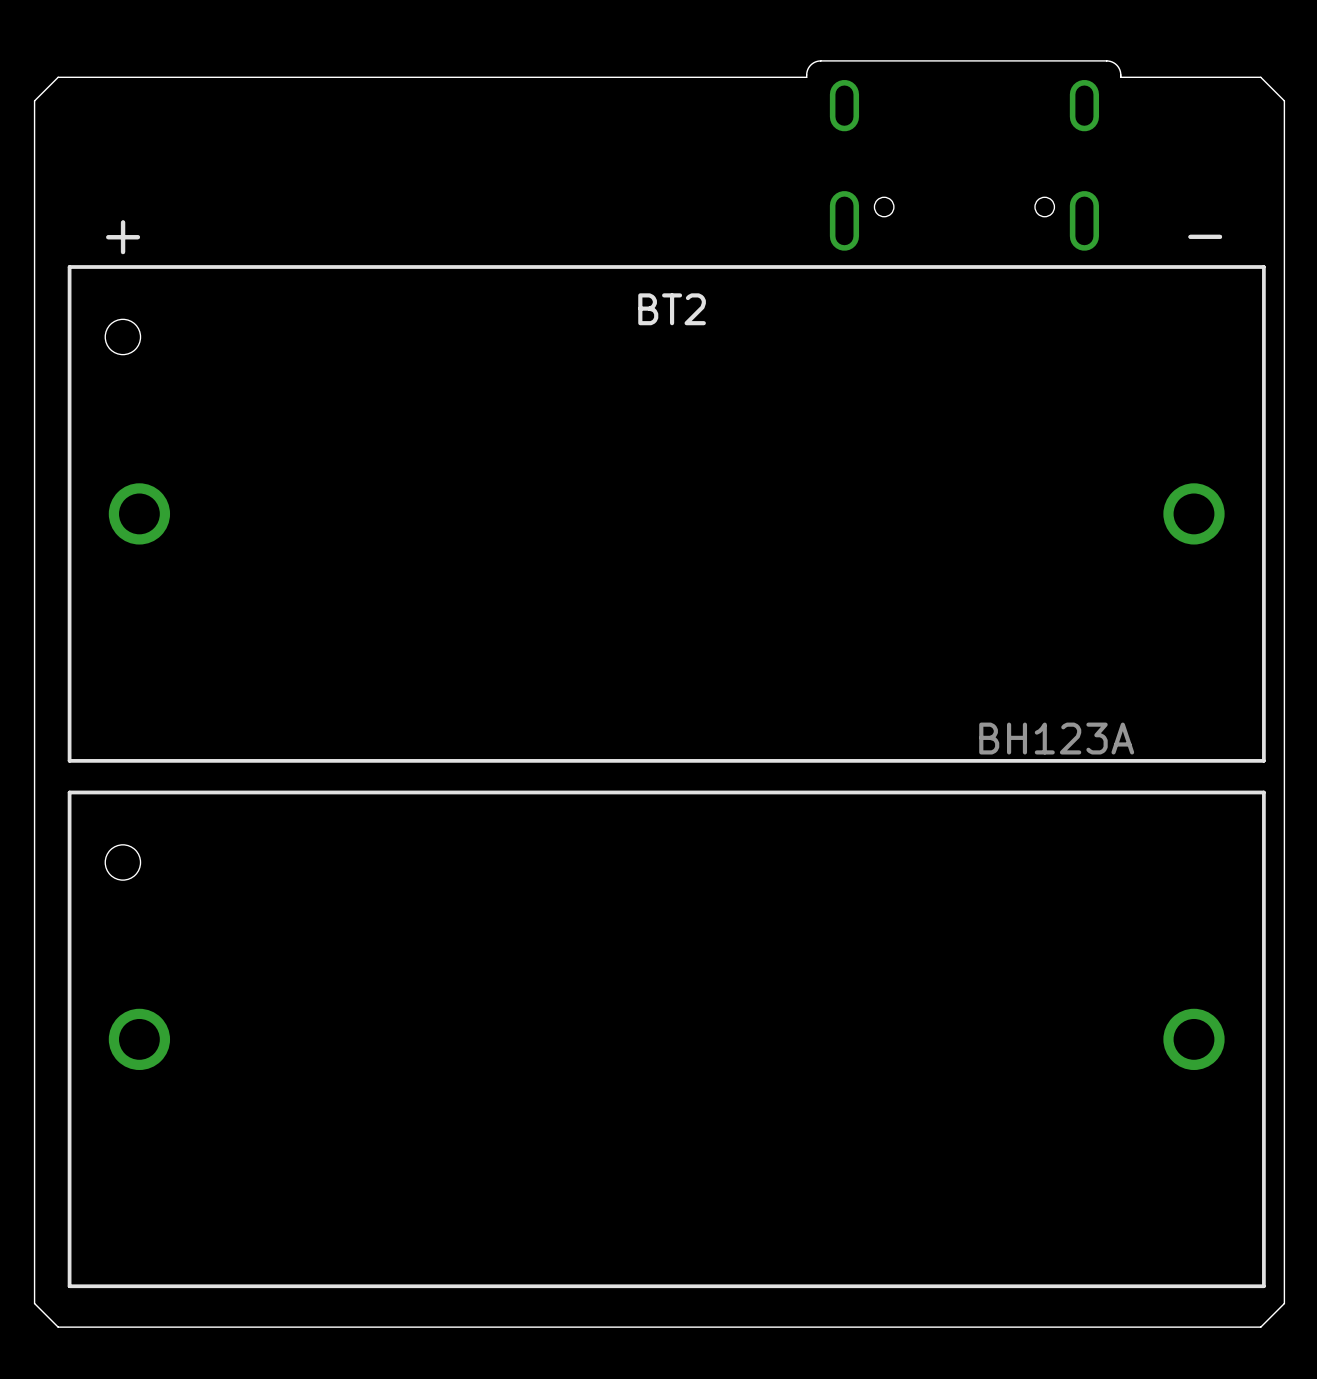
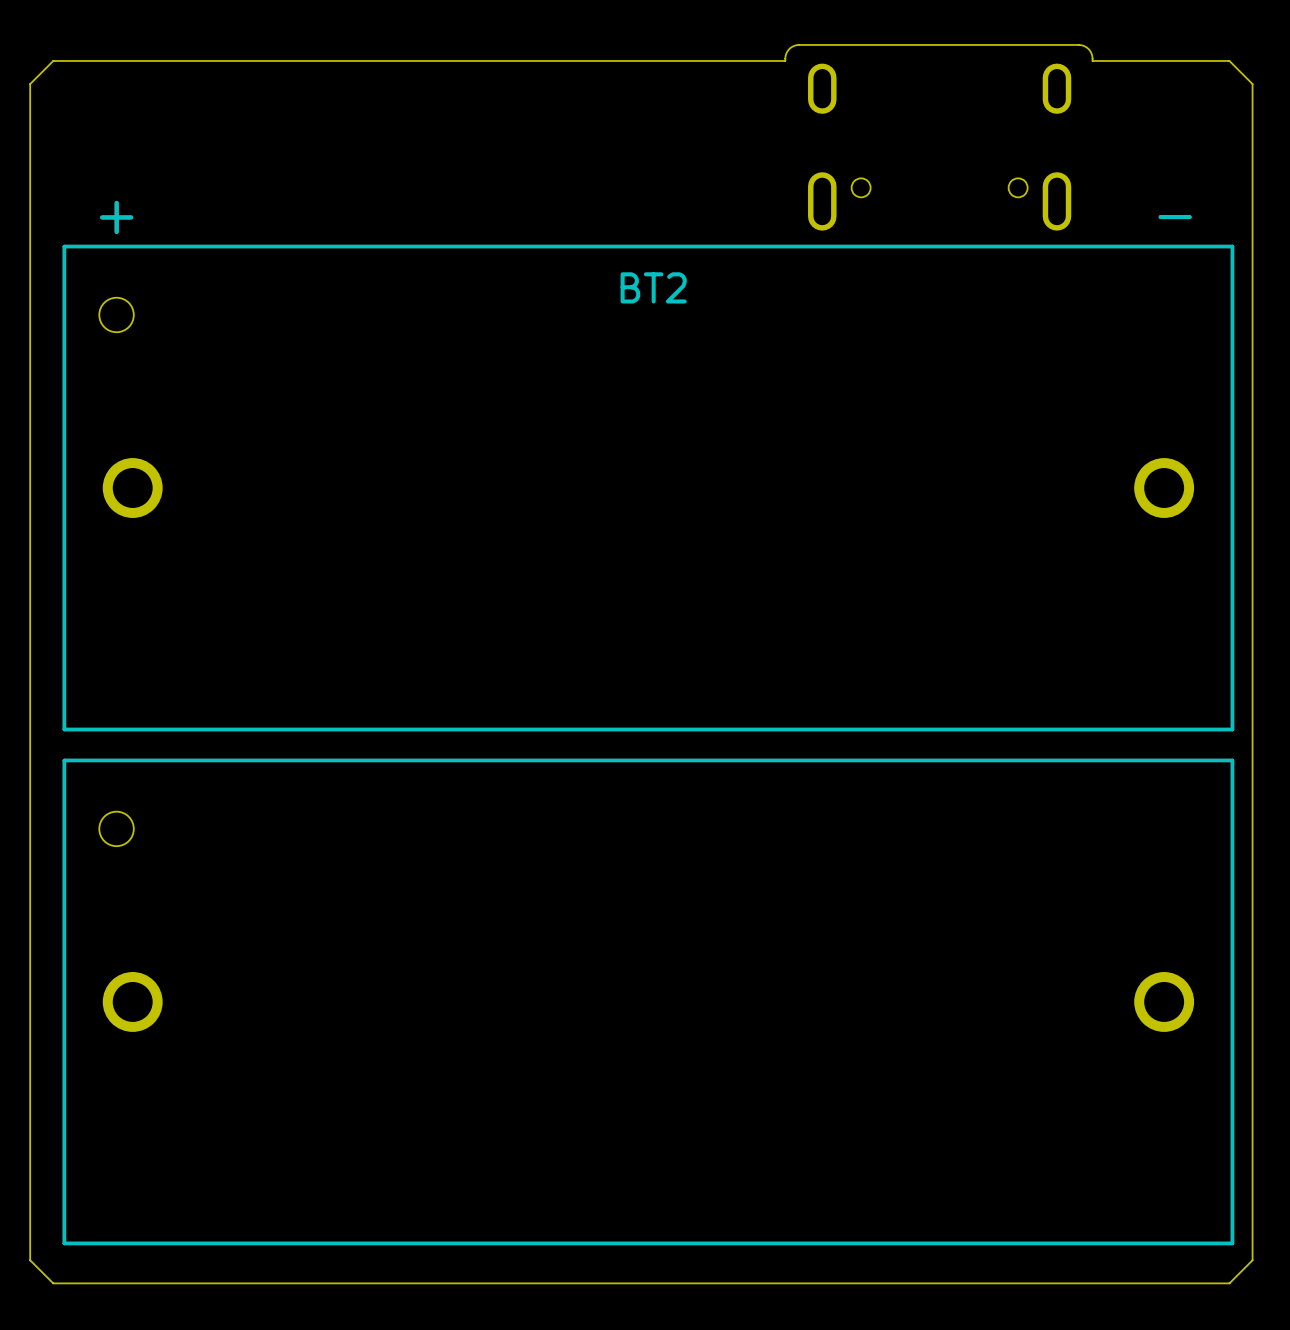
part value: BH123A (1056, 738) -> none

